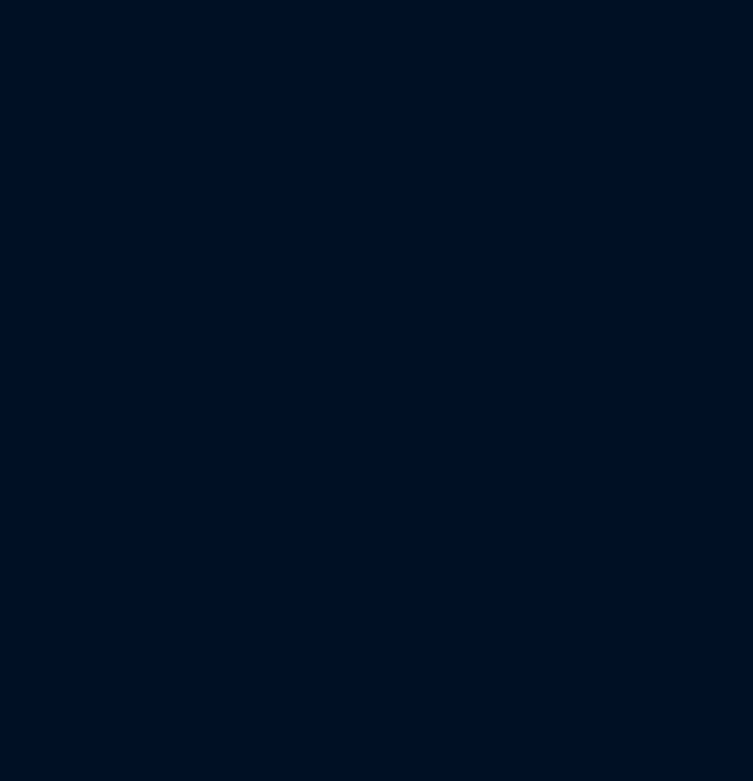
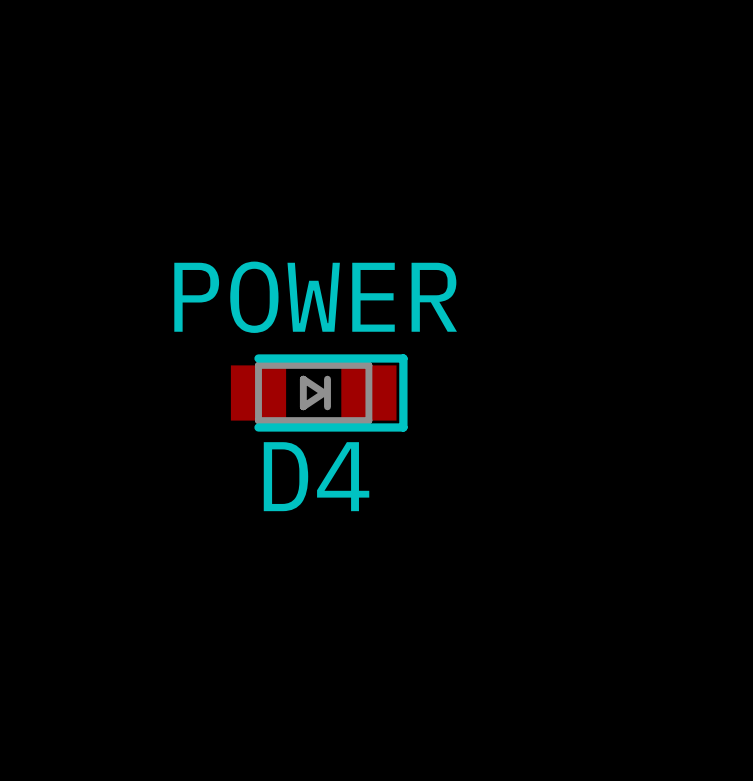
D4: none -> POWER (319, 392)

